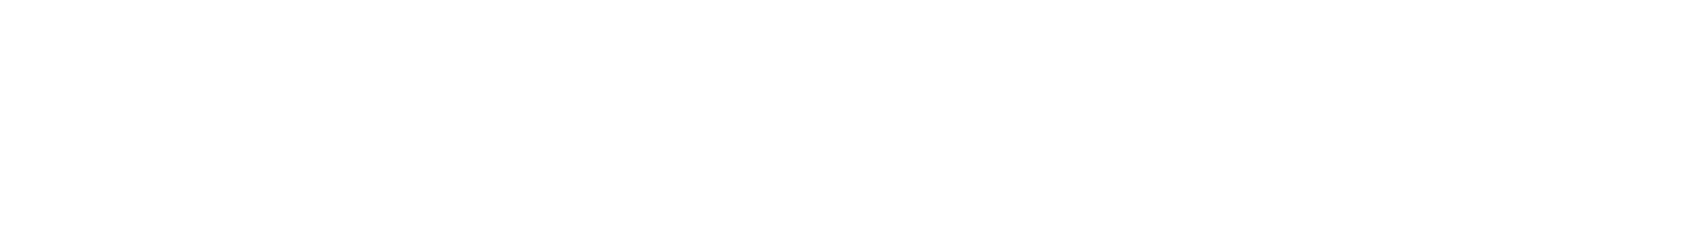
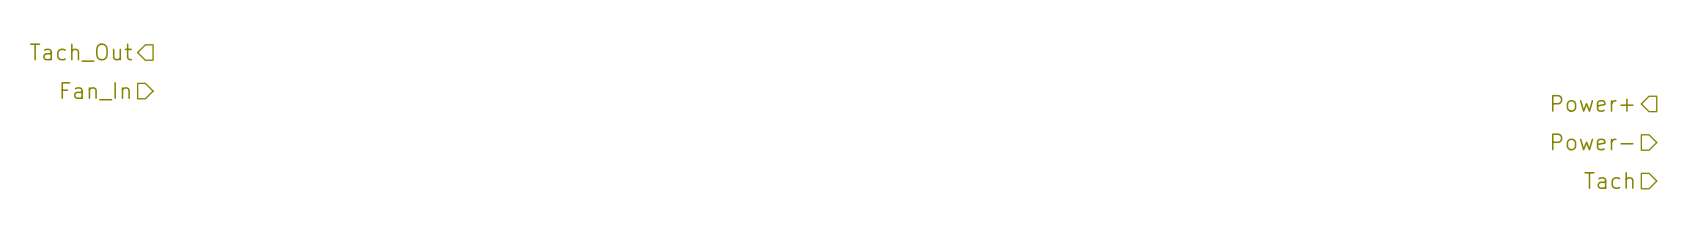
hierarchical label: none -> Tach_Out (81, 52)
hierarchical label: none -> Fan_In (95, 91)
hierarchical label: none -> Power+ (1592, 103)
hierarchical label: none -> Power- (1592, 141)
hierarchical label: none -> Tach (1608, 180)

